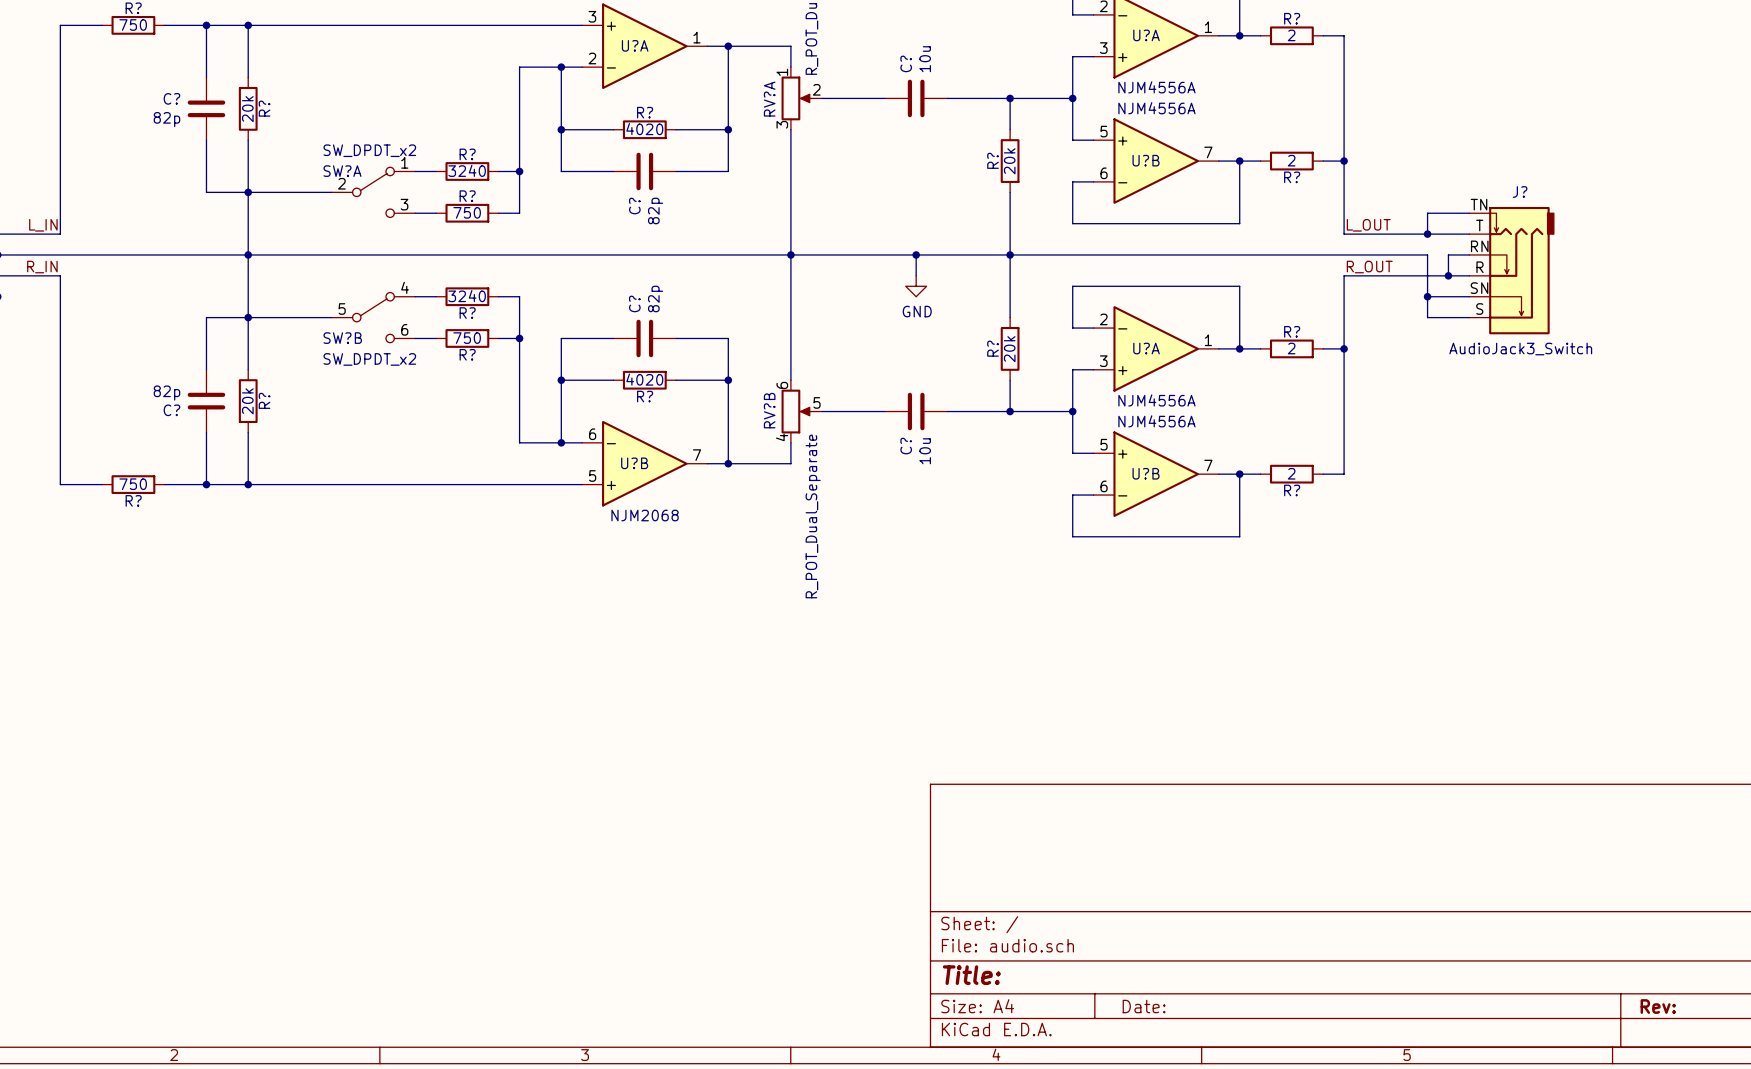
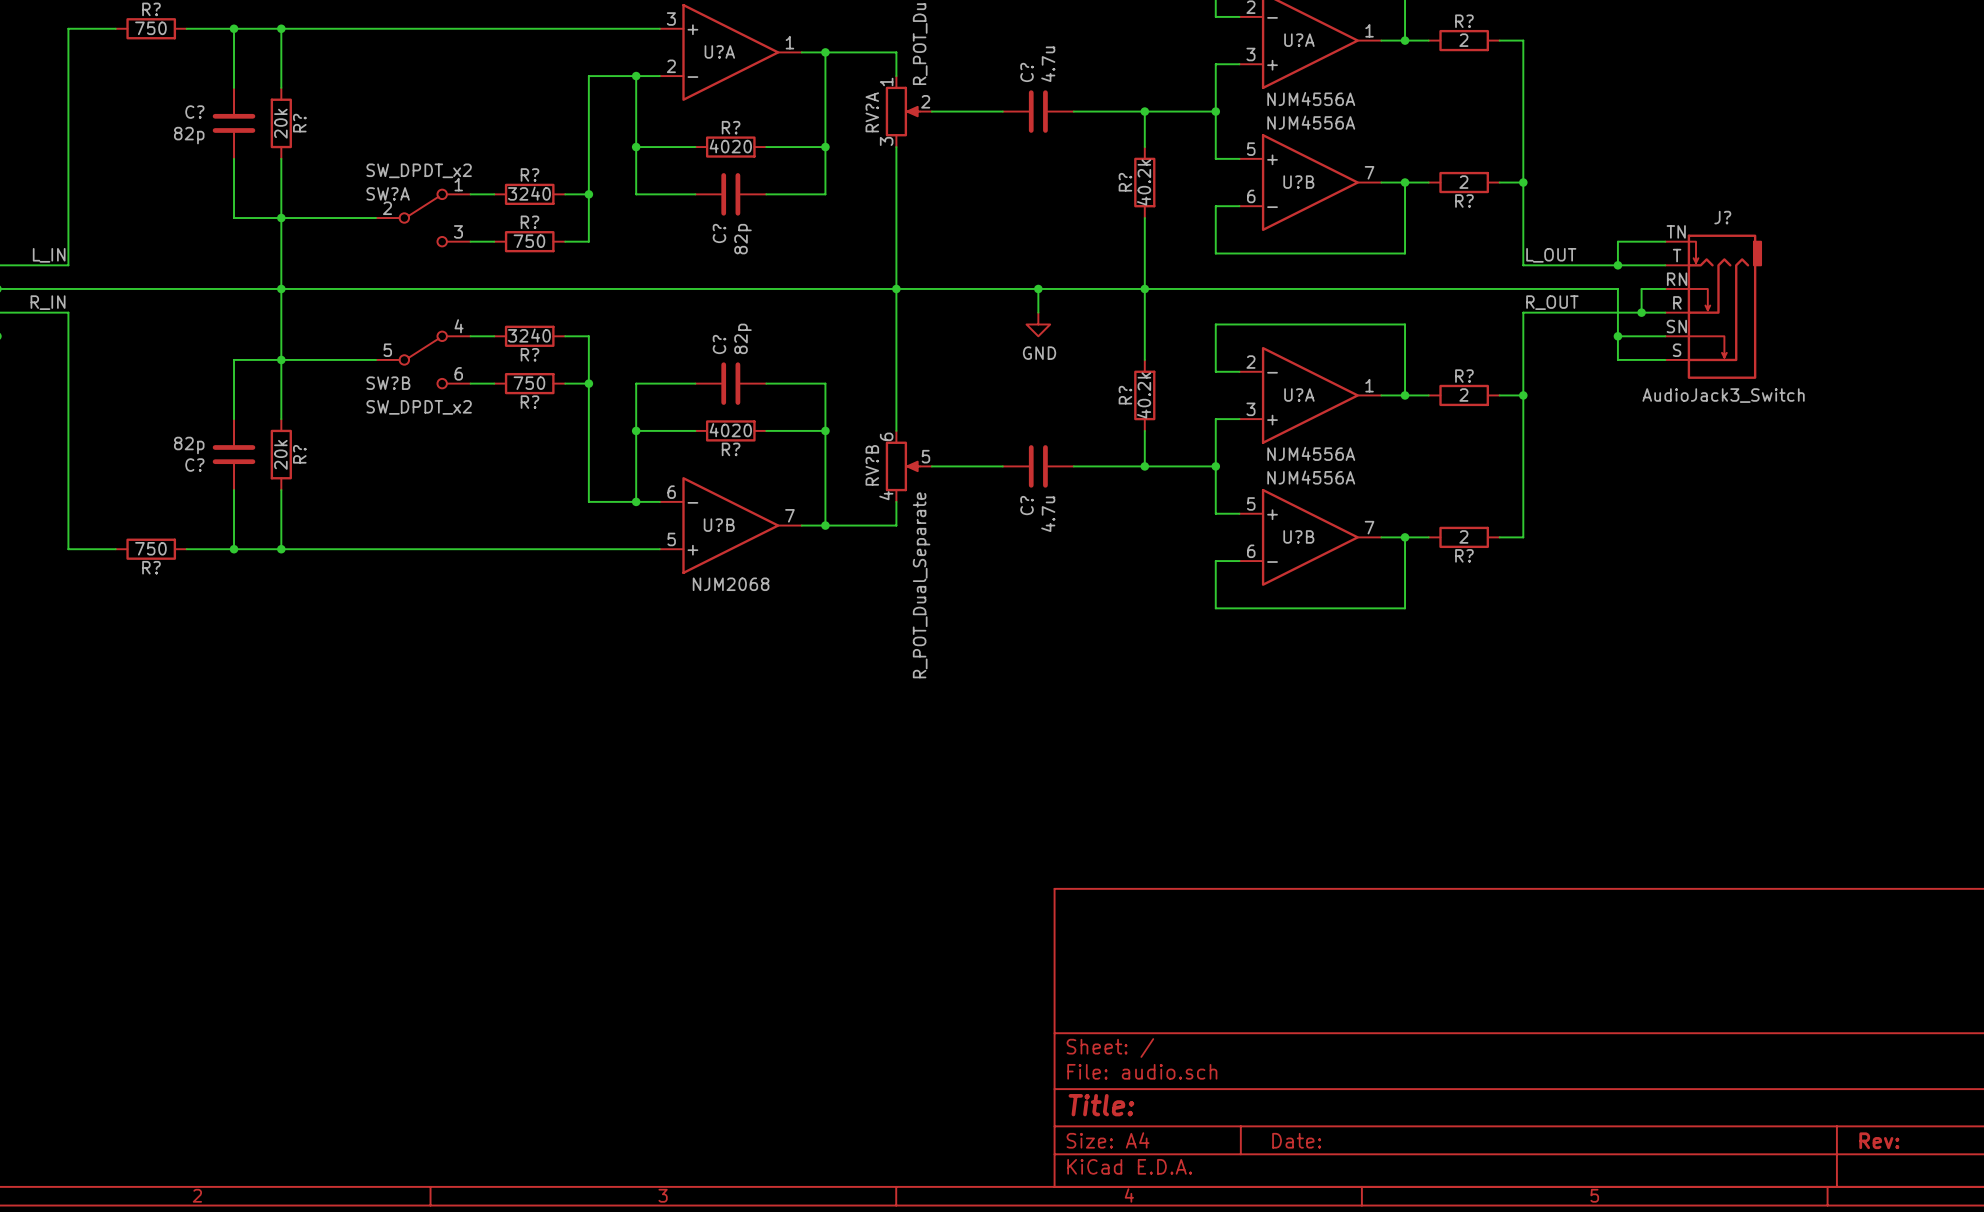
C? value: 10u (925, 59) -> 4.7u (1048, 64)
R? value: 20k (1009, 161) -> 40.2k (1144, 182)
R? value: 20k (1009, 349) -> 40.2k (1144, 395)
C? value: 10u (925, 451) -> 4.7u (1048, 514)

